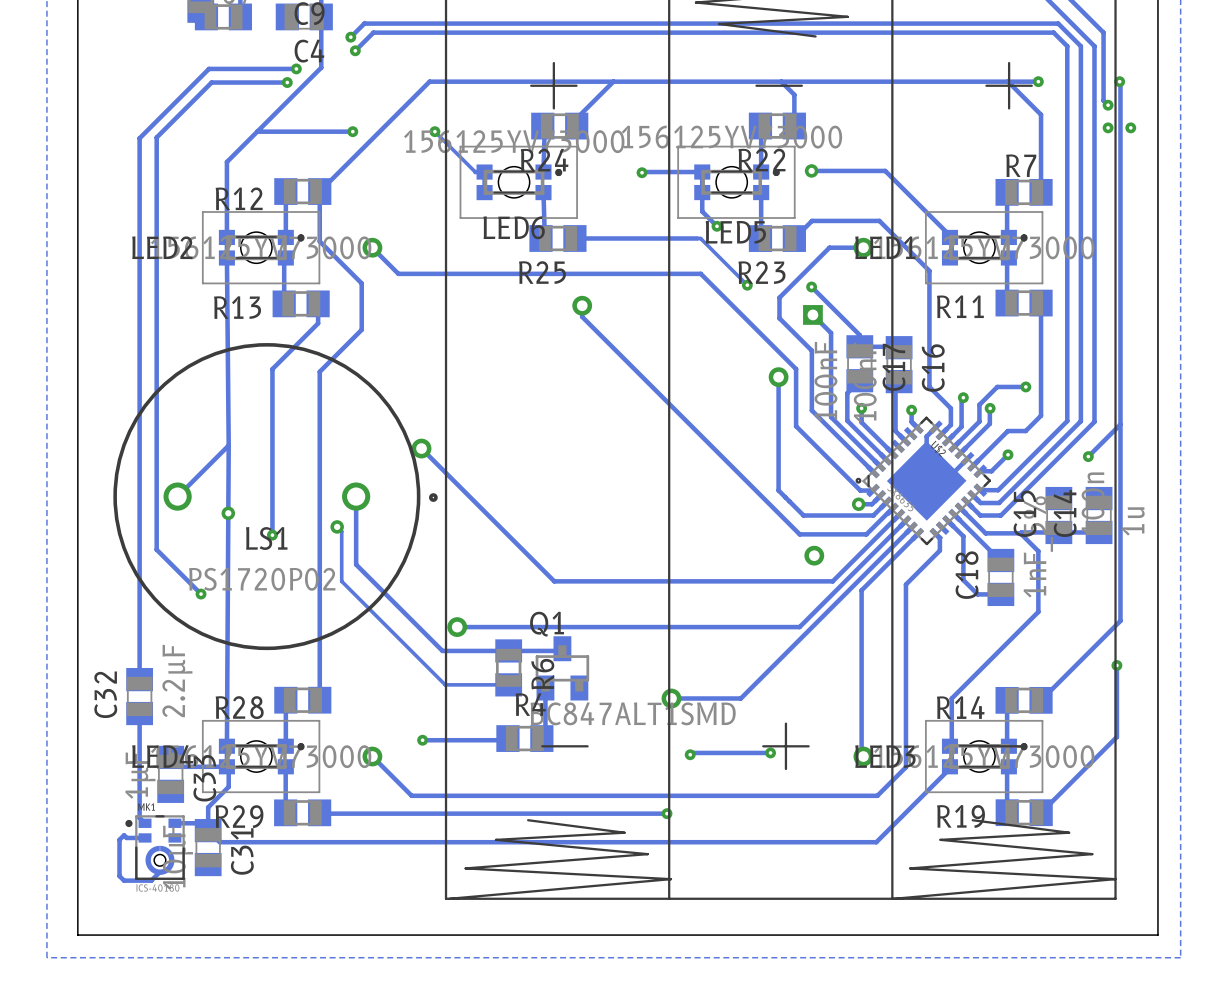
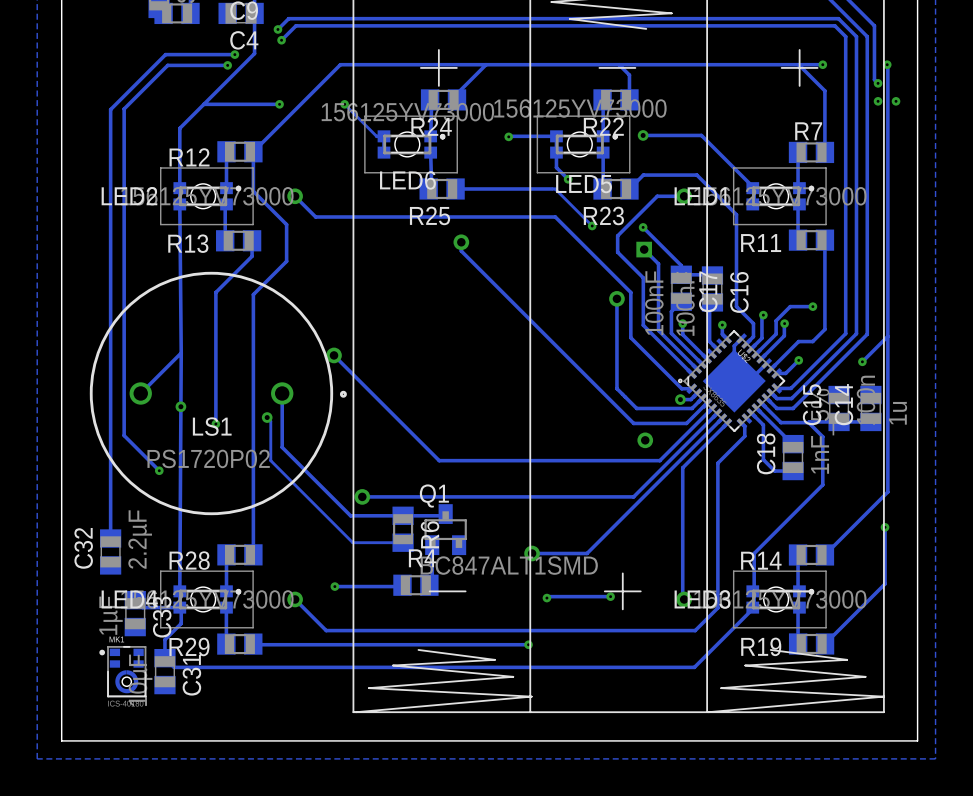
track: (139, 713) (139, 817) (145, 823) -> none
track: (200, 823) (174, 823) -> none
track: (145, 837) (126, 837) (124, 835) (119, 839) (119, 876) (124, 880) (151, 880) (159, 872) -> none

